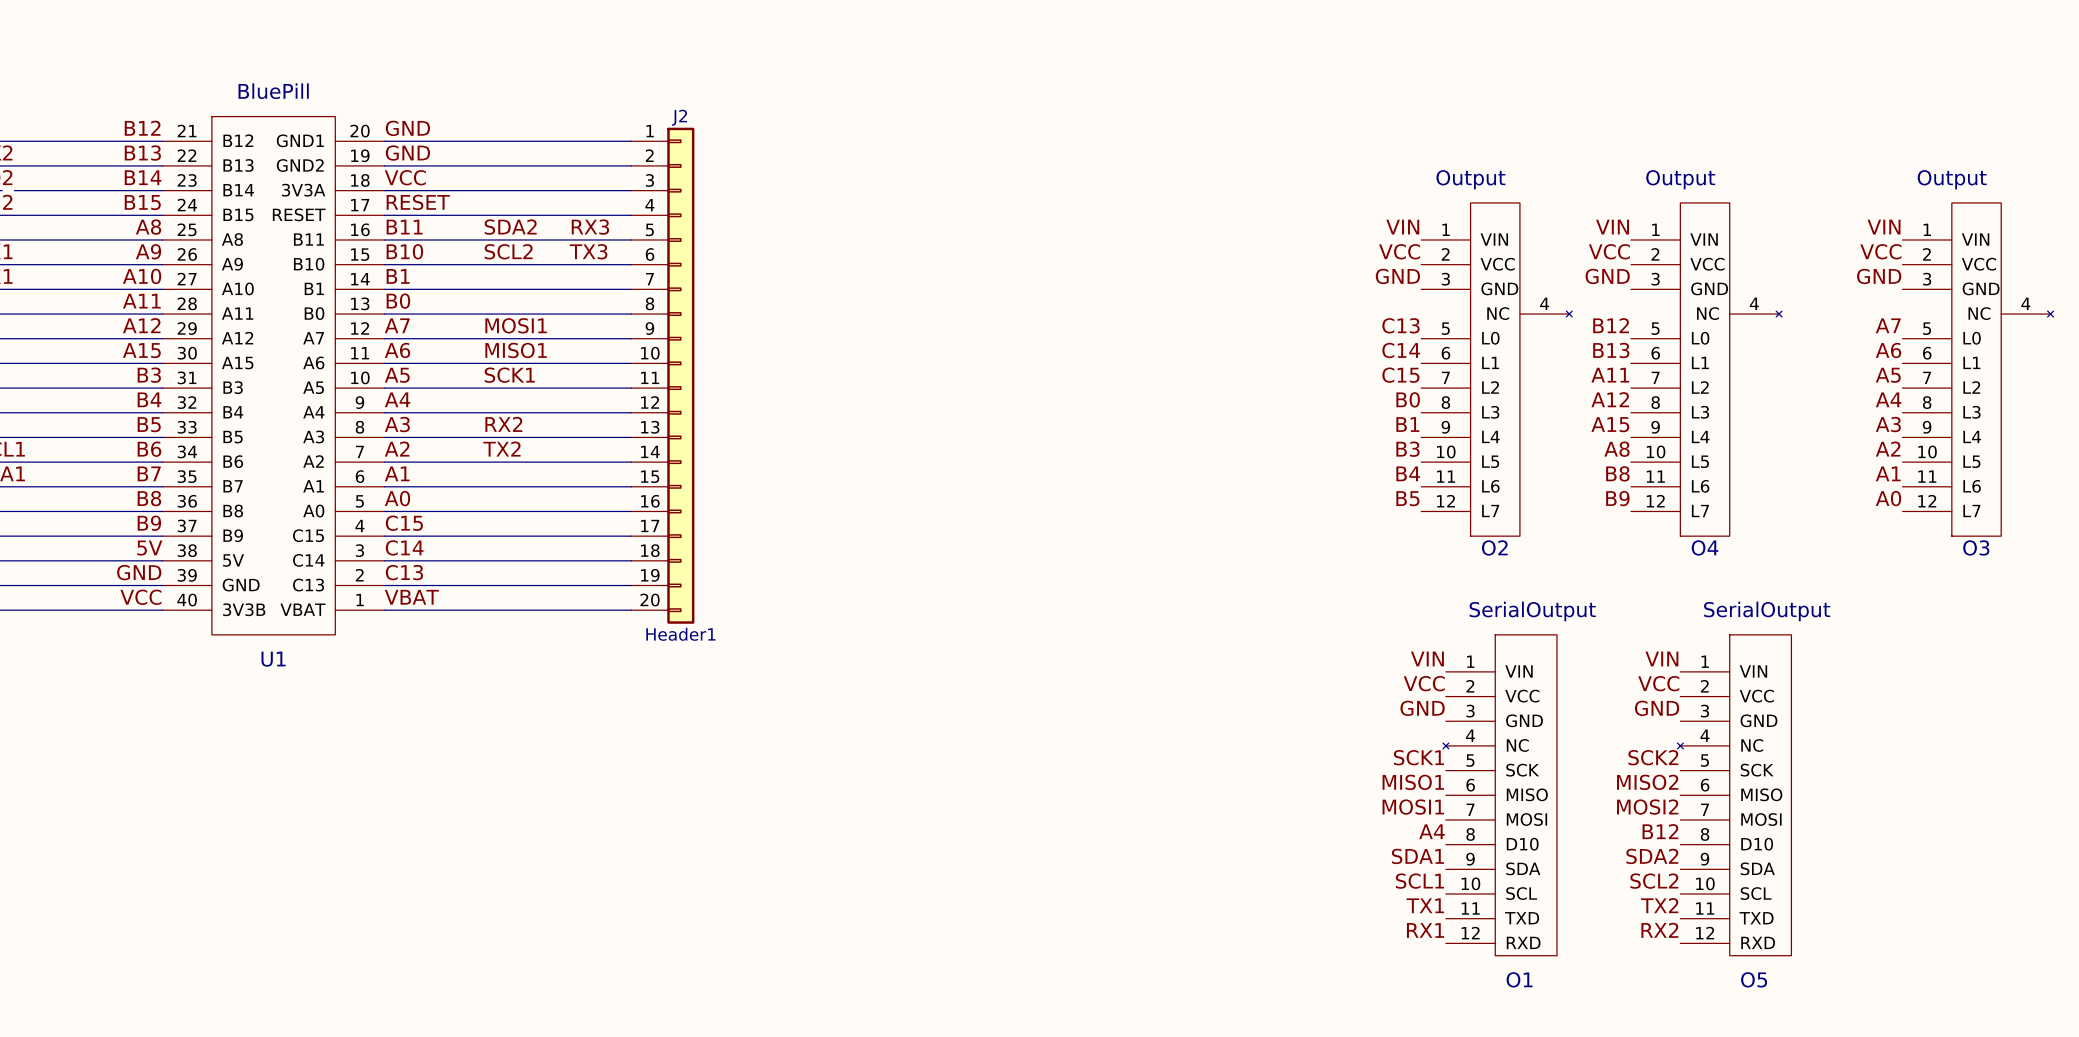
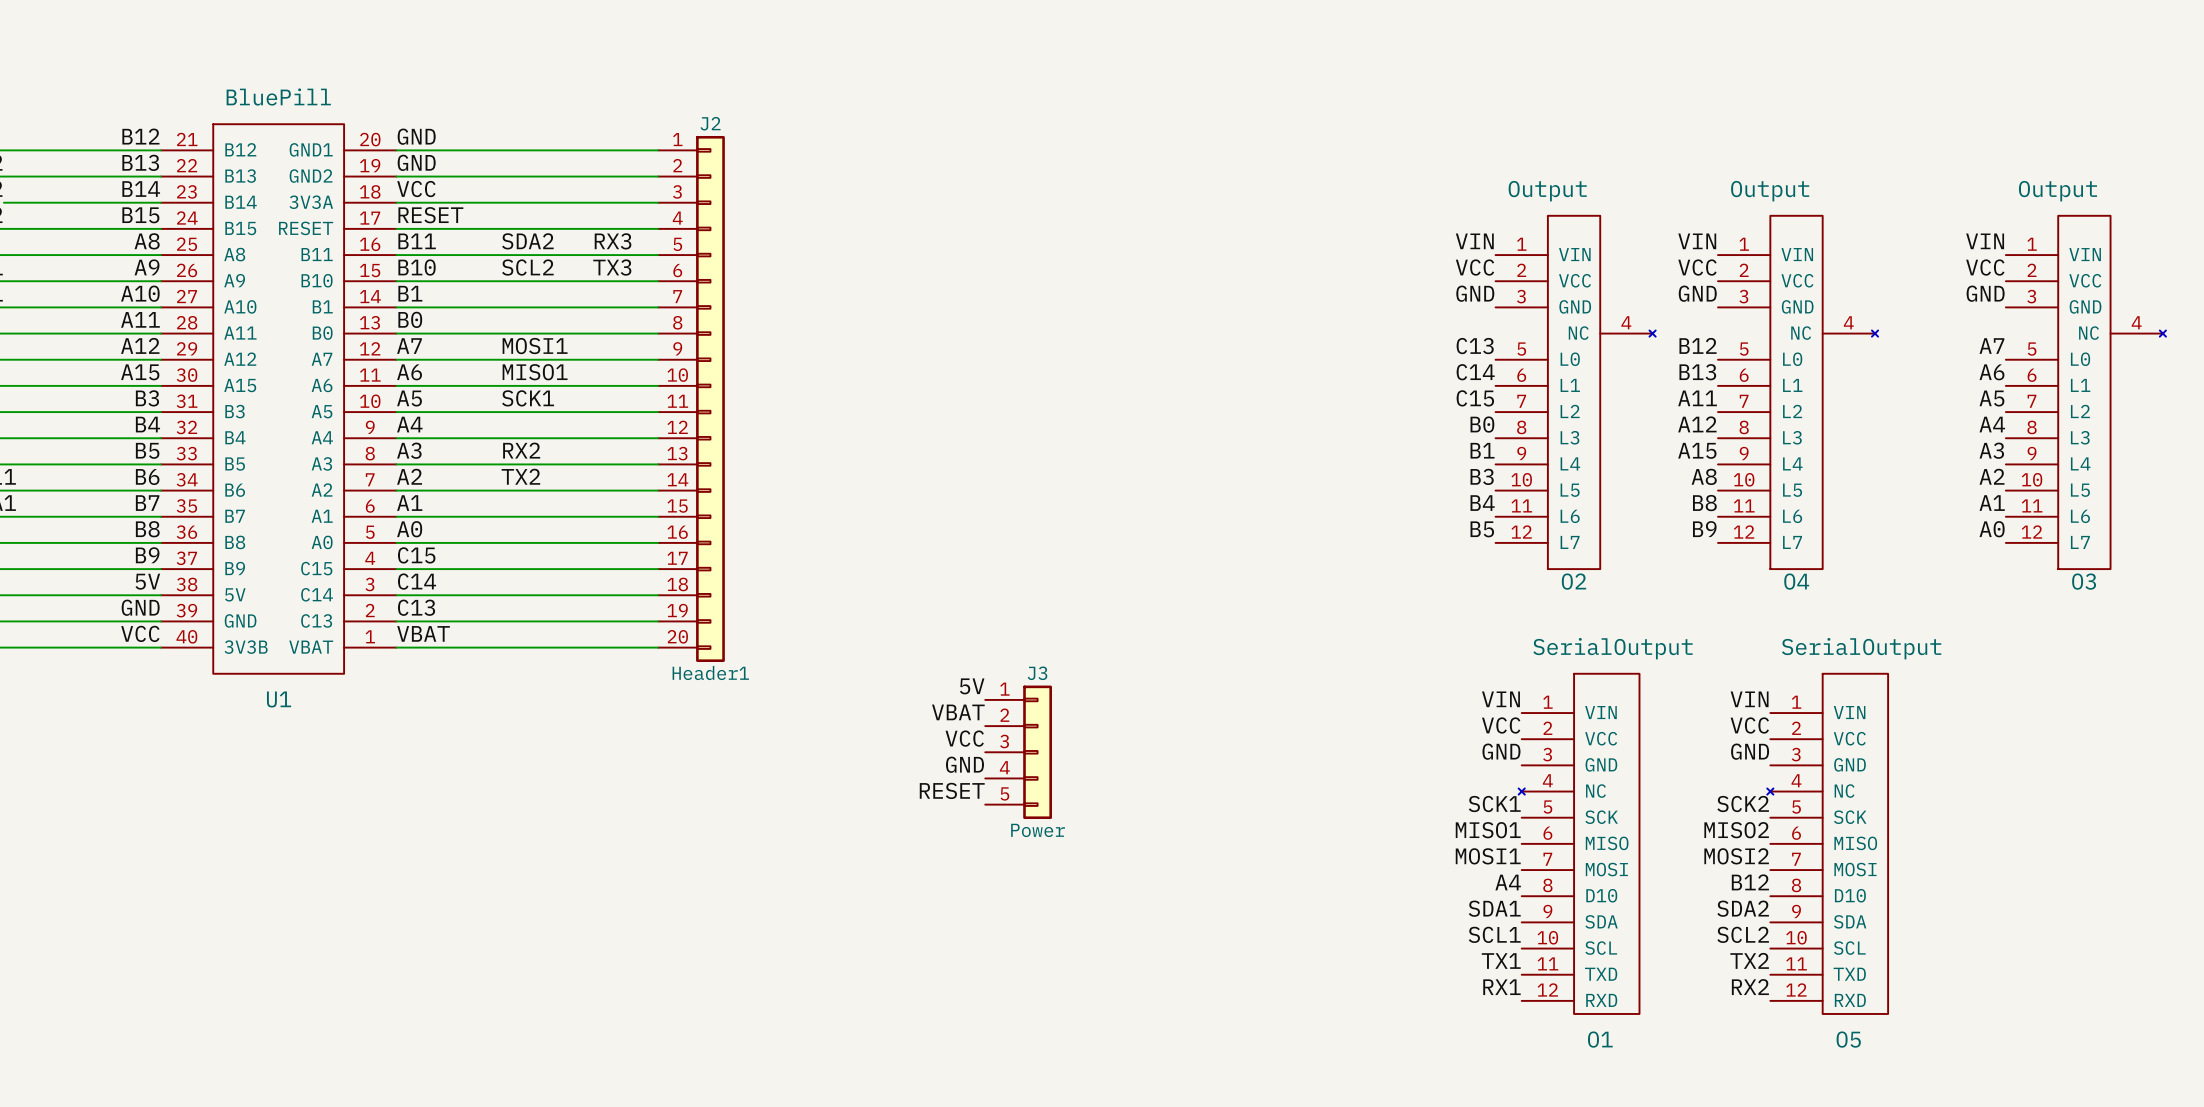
label: none -> 5V (972, 686)
label: none -> VBAT (958, 712)
label: none -> VCC (964, 738)
J3: none -> Power (1018, 752)
label: none -> GND (964, 764)
label: none -> RESET (952, 790)

